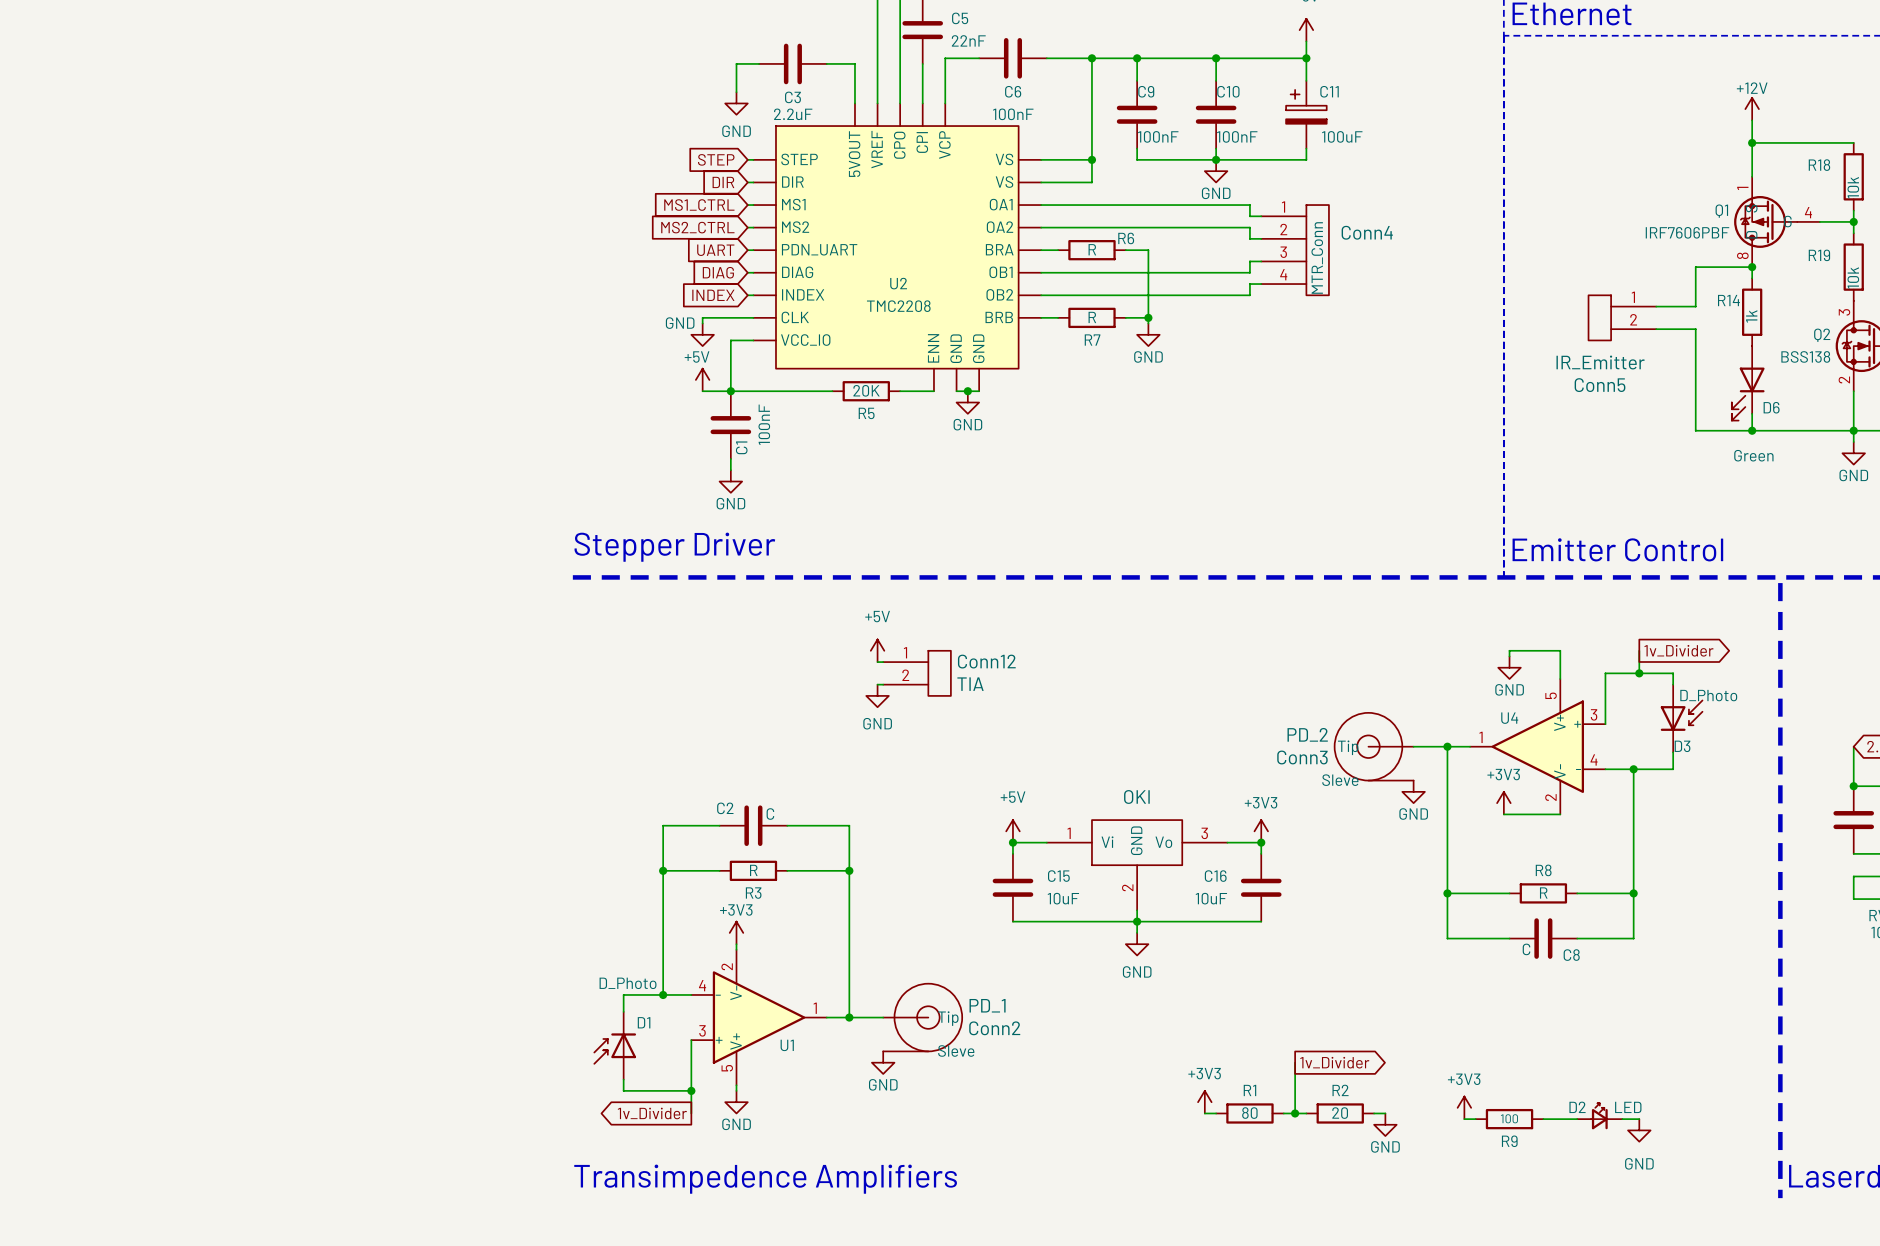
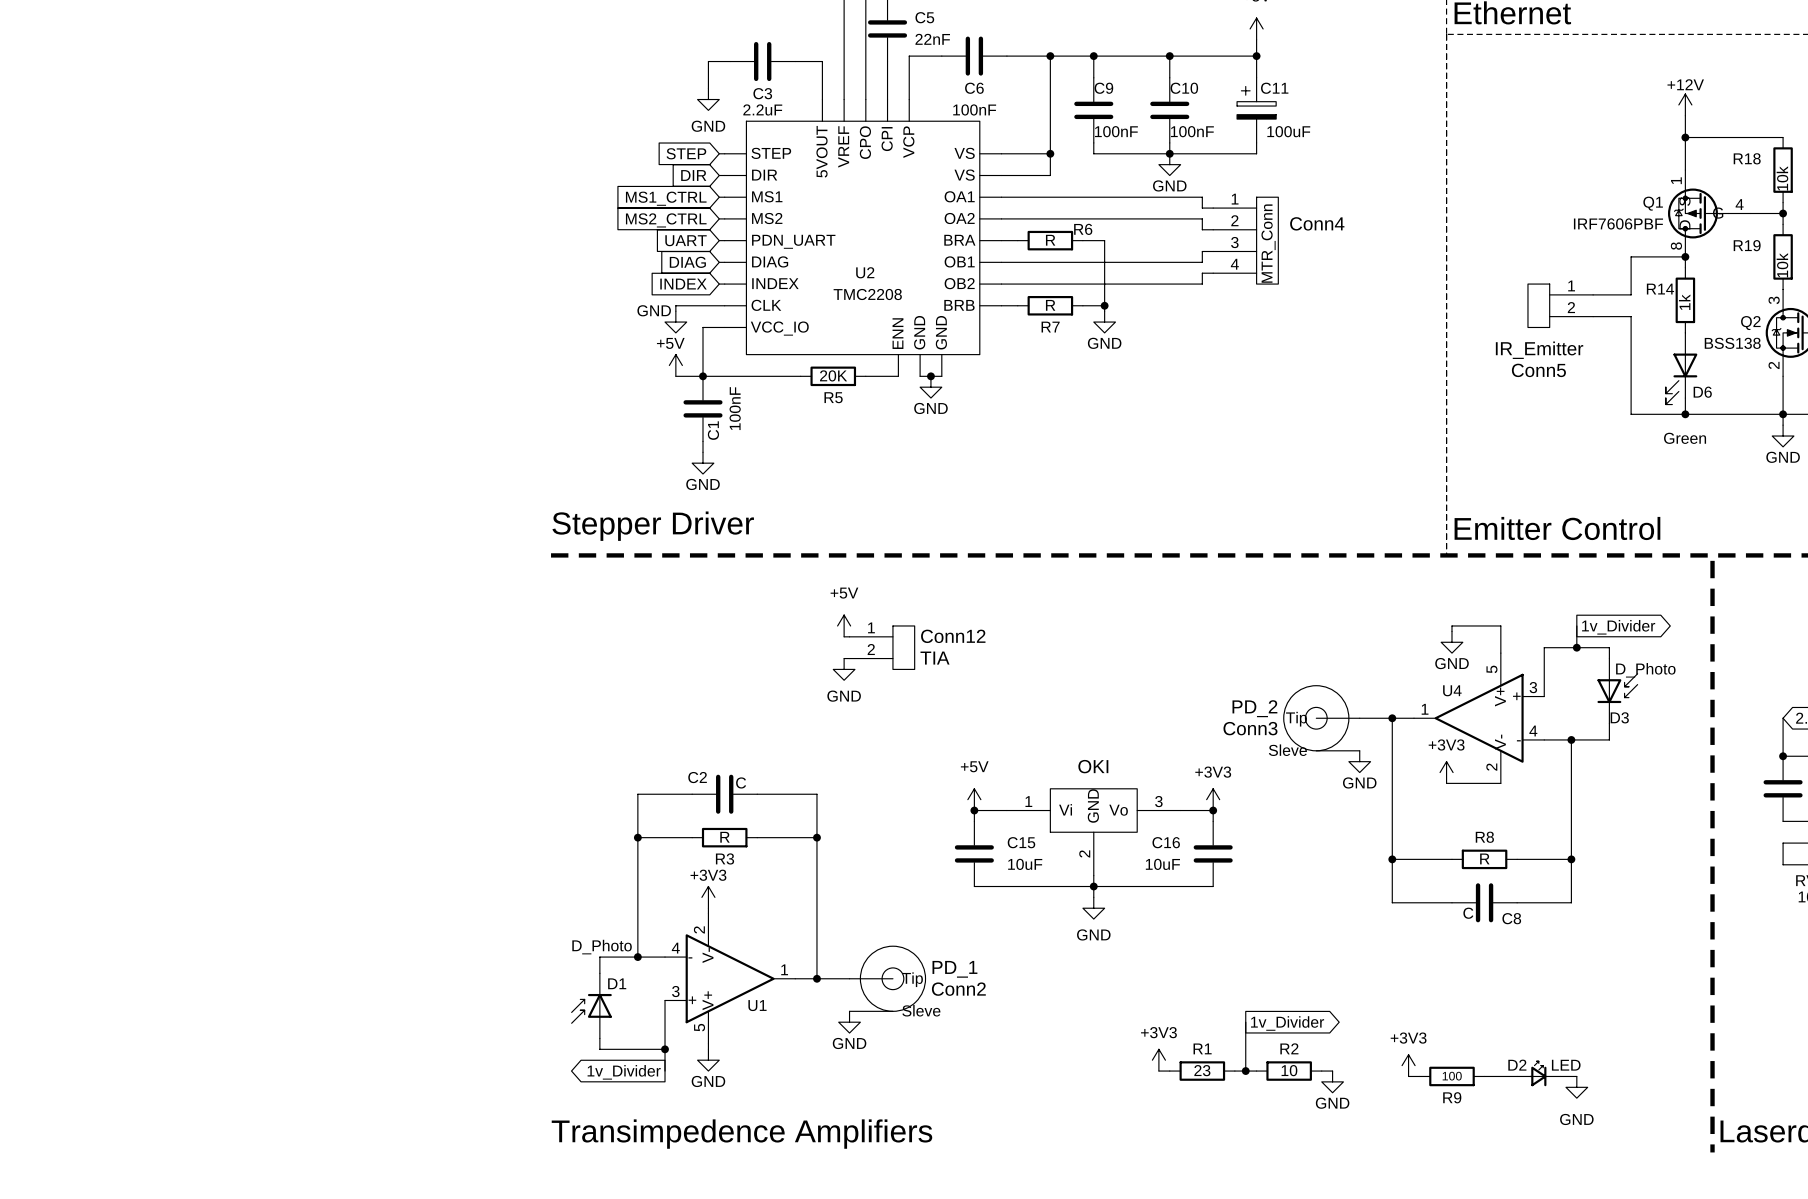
R1 value: 80 (1249, 1113) -> 23 (1202, 1070)
R2 value: 20 (1340, 1113) -> 10 (1289, 1070)

